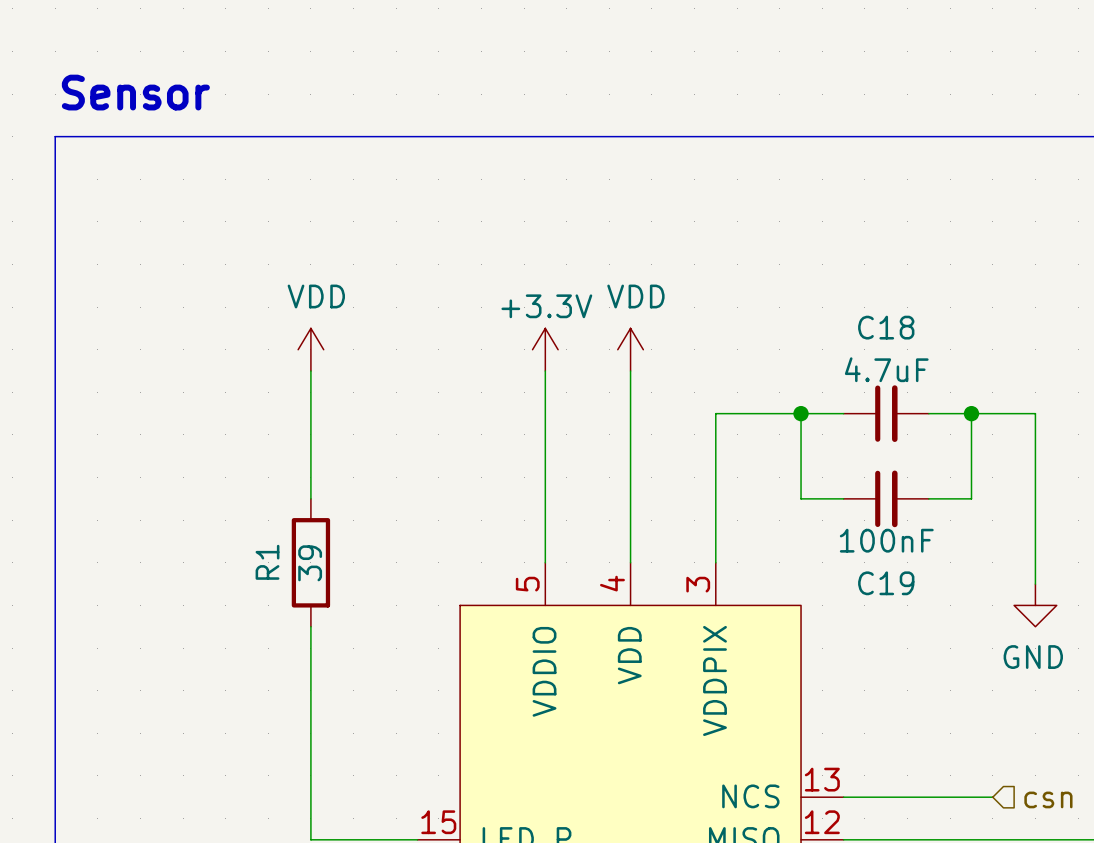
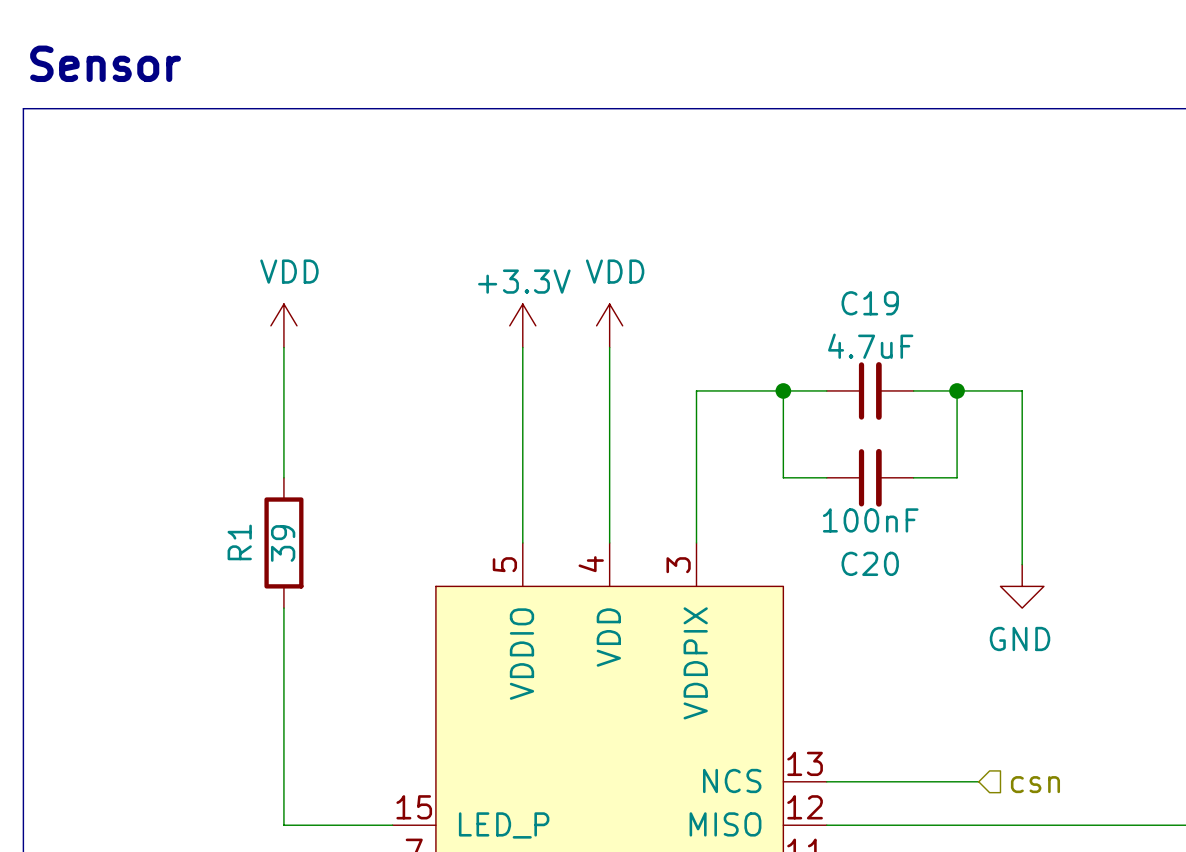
C18 name: C18 (886, 327) -> C19 (870, 303)
C19 name: C19 (886, 583) -> C20 (870, 563)

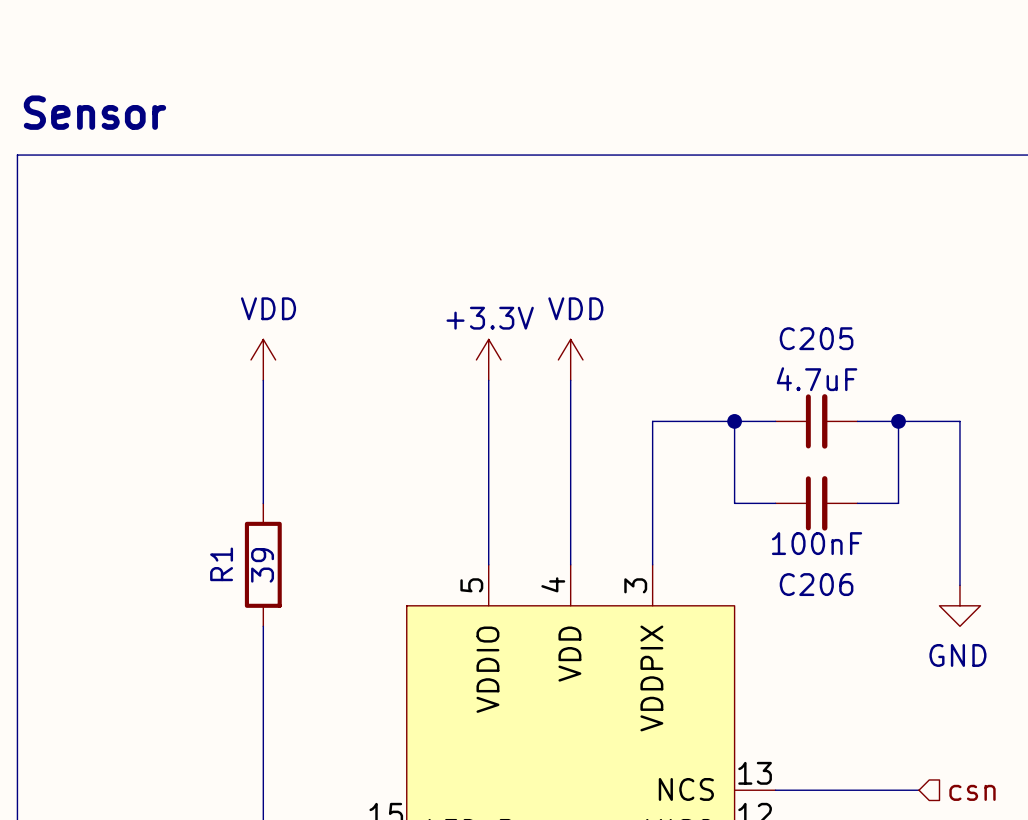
C19 name: C19 (870, 303) -> C205 (816, 338)
C20 name: C20 (870, 563) -> C206 (816, 584)

